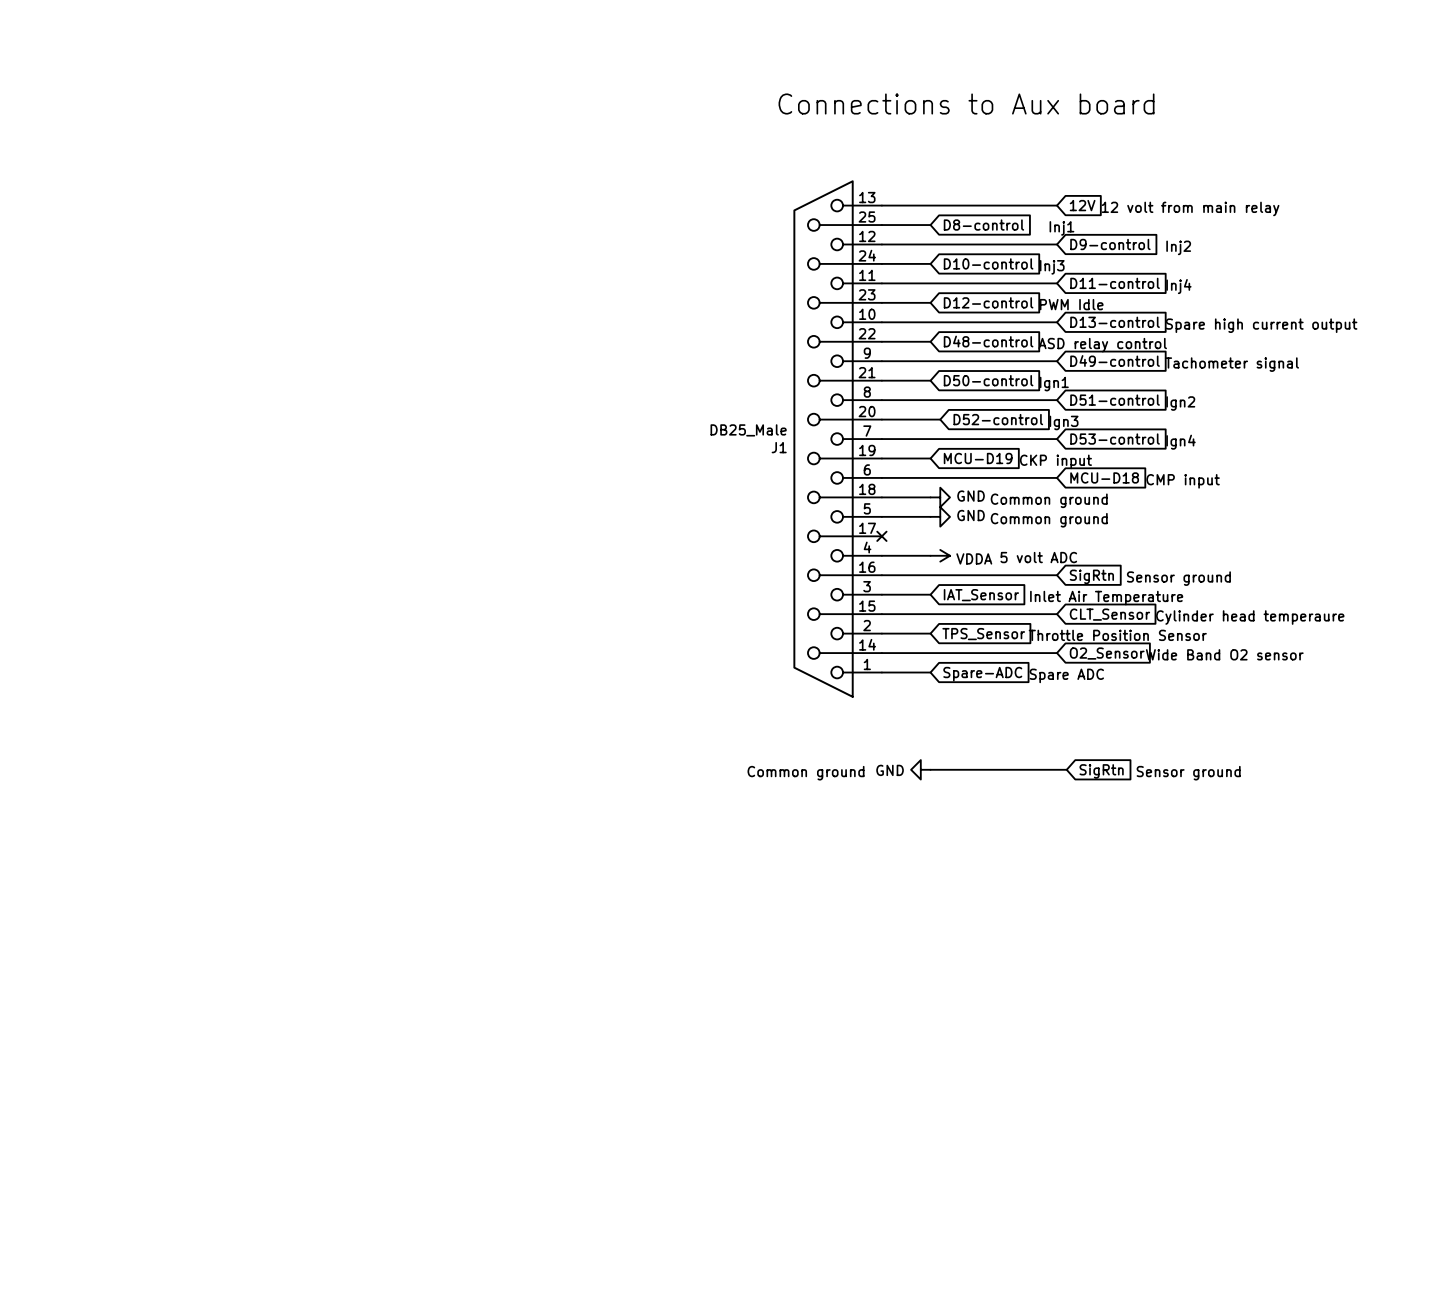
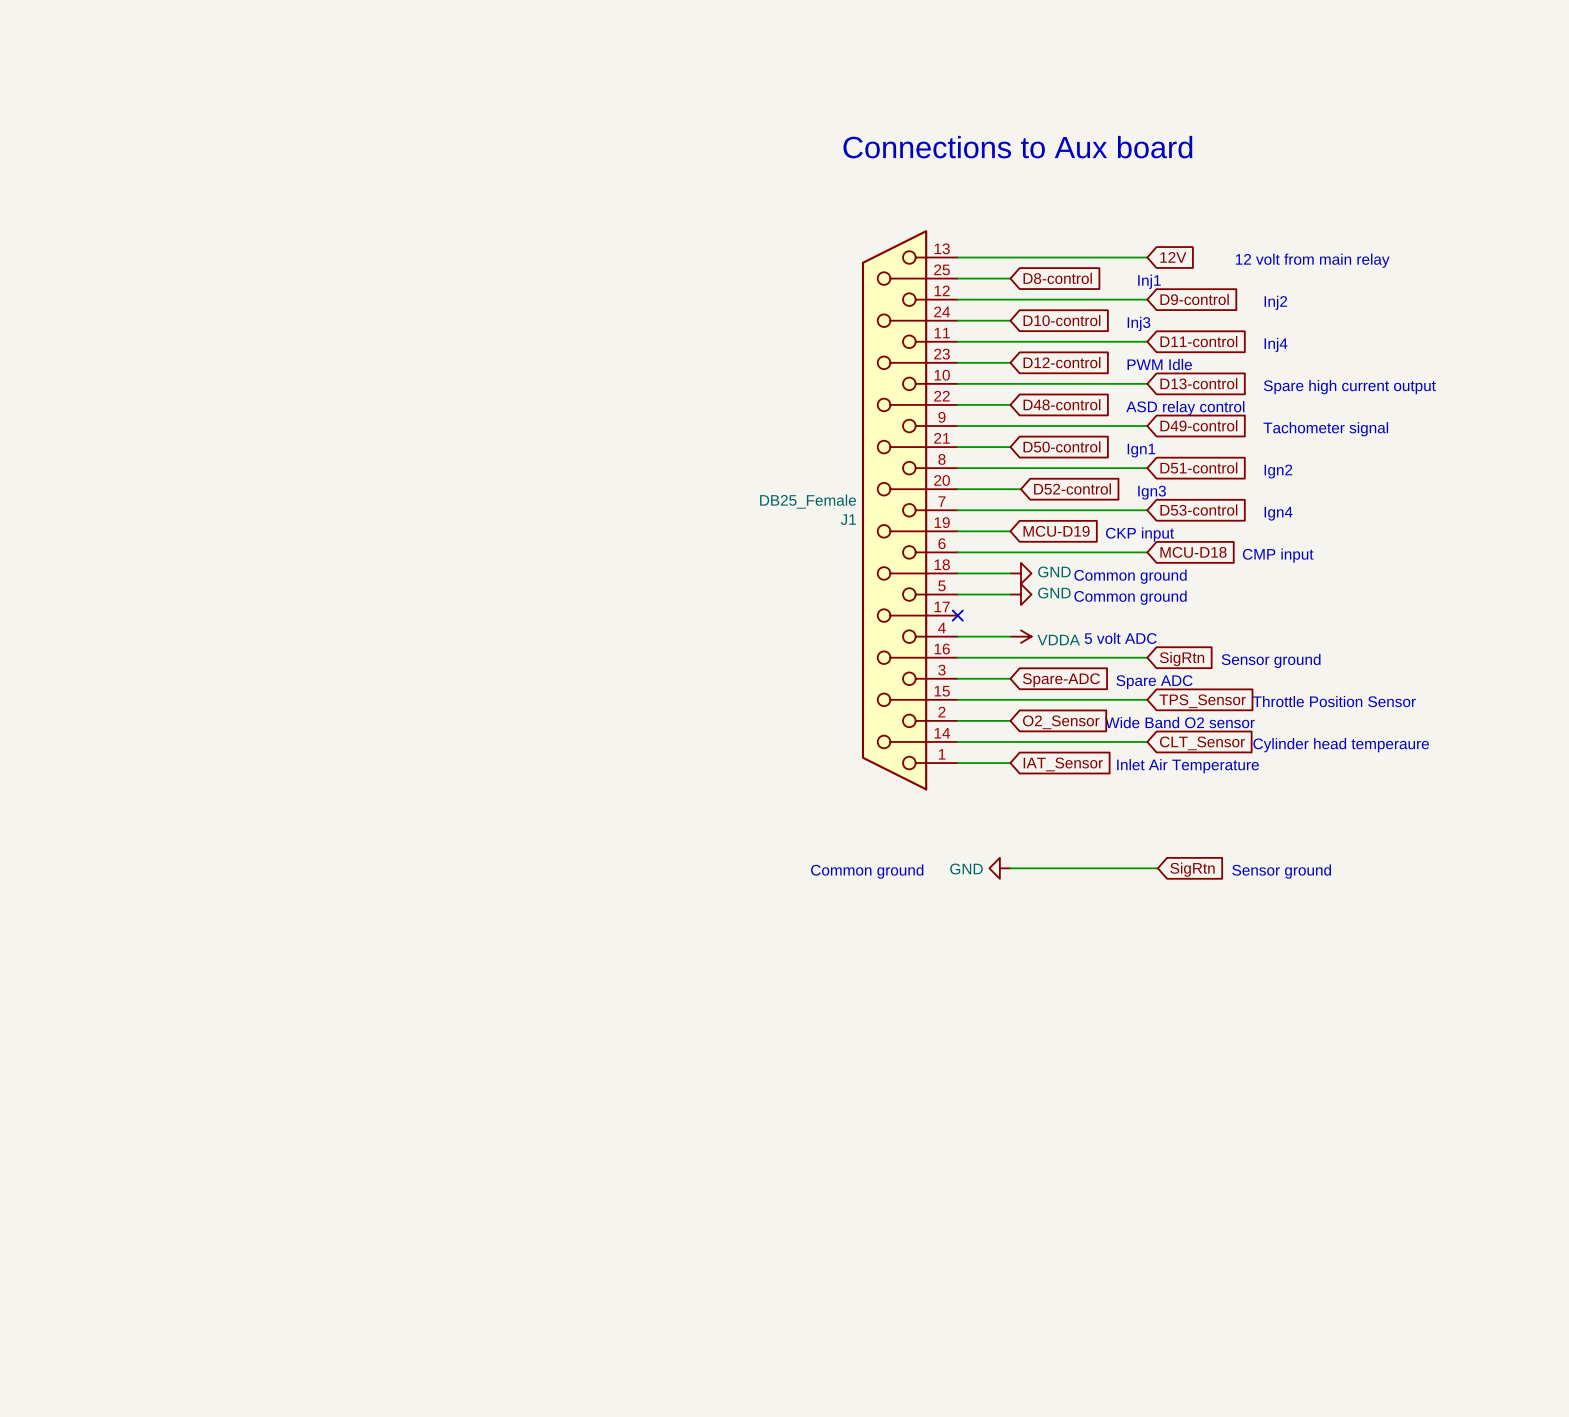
J1 value: DB25_Male (748, 430) -> DB25_Female (808, 501)
global label: IAT_Sensor (981, 595) -> Spare-ADC (1061, 680)
text: Inlet Air Temperature (1106, 598) -> Spare ADC (1154, 682)
global label: CLT_Sensor (1109, 614) -> TPS_Sensor (1202, 701)
text: Cylinder head temperaure (1250, 617) -> Throttle Position Sensor (1334, 701)
global label: TPS_Sensor (983, 634) -> O2_Sensor (1061, 722)
text: Throttle Position Sensor (1117, 635) -> none
global label: O2_Sensor (1107, 653) -> CLT_Sensor (1202, 743)
text position: Wide Band O2 sensor (1224, 654) -> Wide Band O2 sensor (1180, 722)
text: none -> Cylinder head temperaure (1341, 745)
global label: Spare-ADC (982, 674) -> IAT_Sensor (1063, 764)
text: Spare ADC (1066, 675) -> Inlet Air Temperature (1188, 766)

